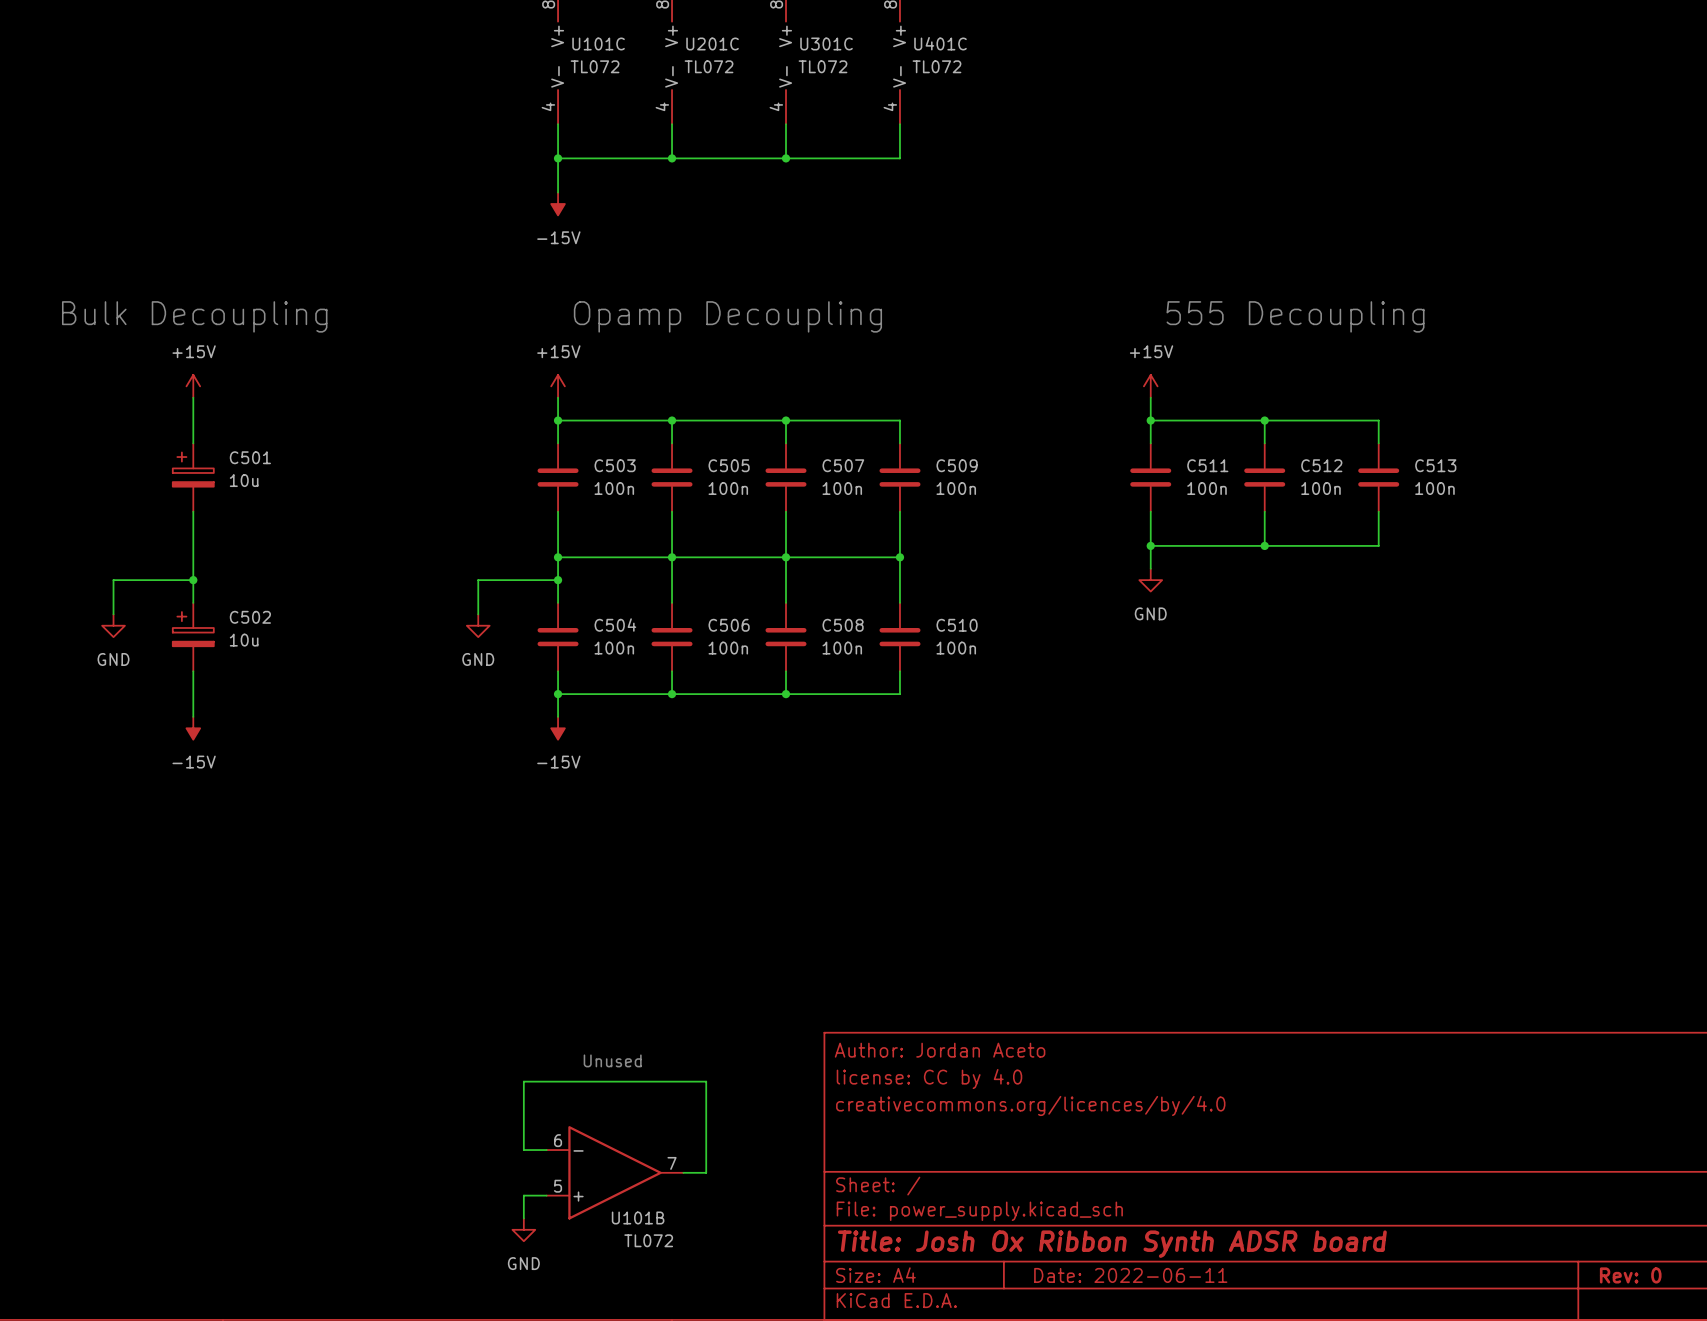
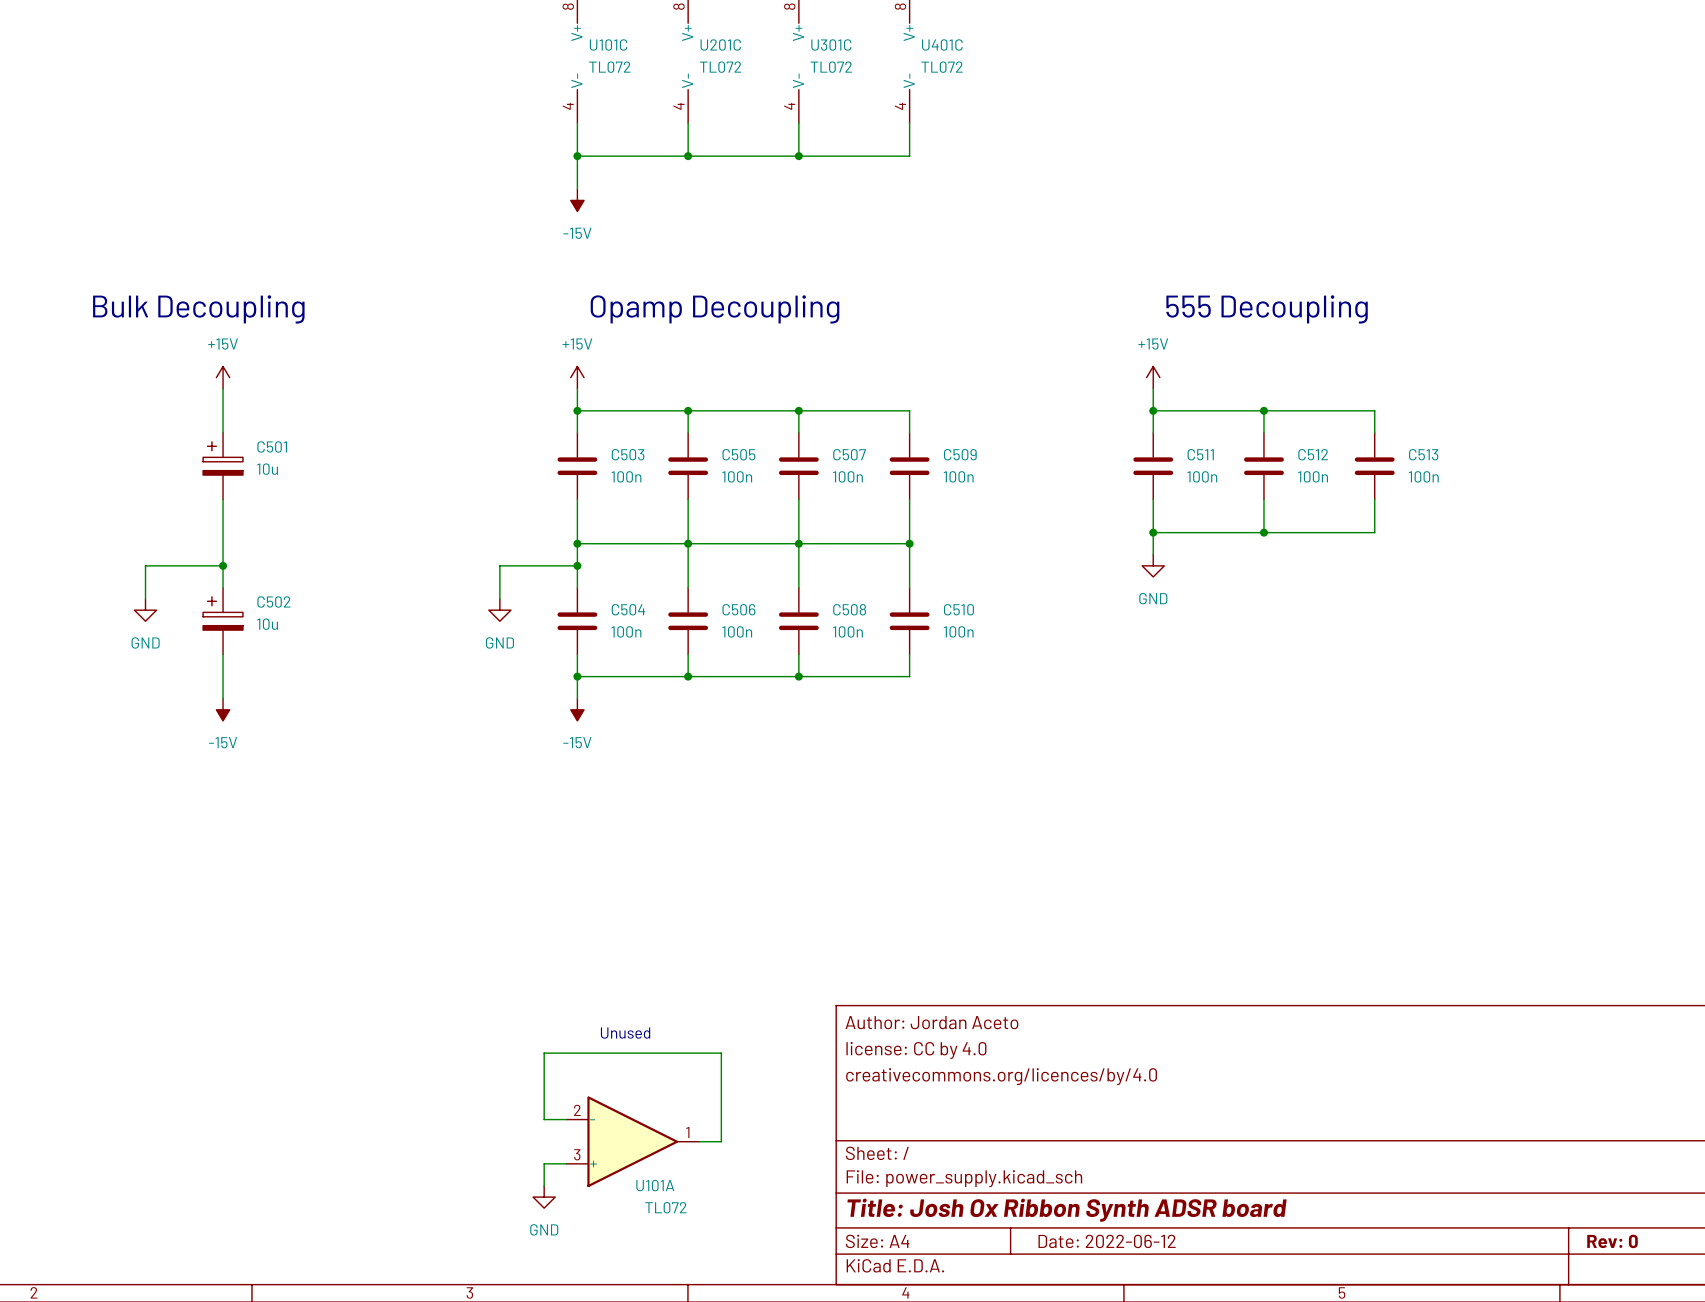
U101B pin number: 6 (558, 1140) -> 2 (577, 1110)
U101B pin number: 7 (672, 1163) -> 1 (687, 1132)
U101B pin number: 5 (558, 1186) -> 3 (577, 1154)
U101B name: U101B (638, 1217) -> U101A (655, 1185)
title block: Date: 2022-06-11 (1130, 1275) -> Date: 2022-06-12 (1107, 1241)

